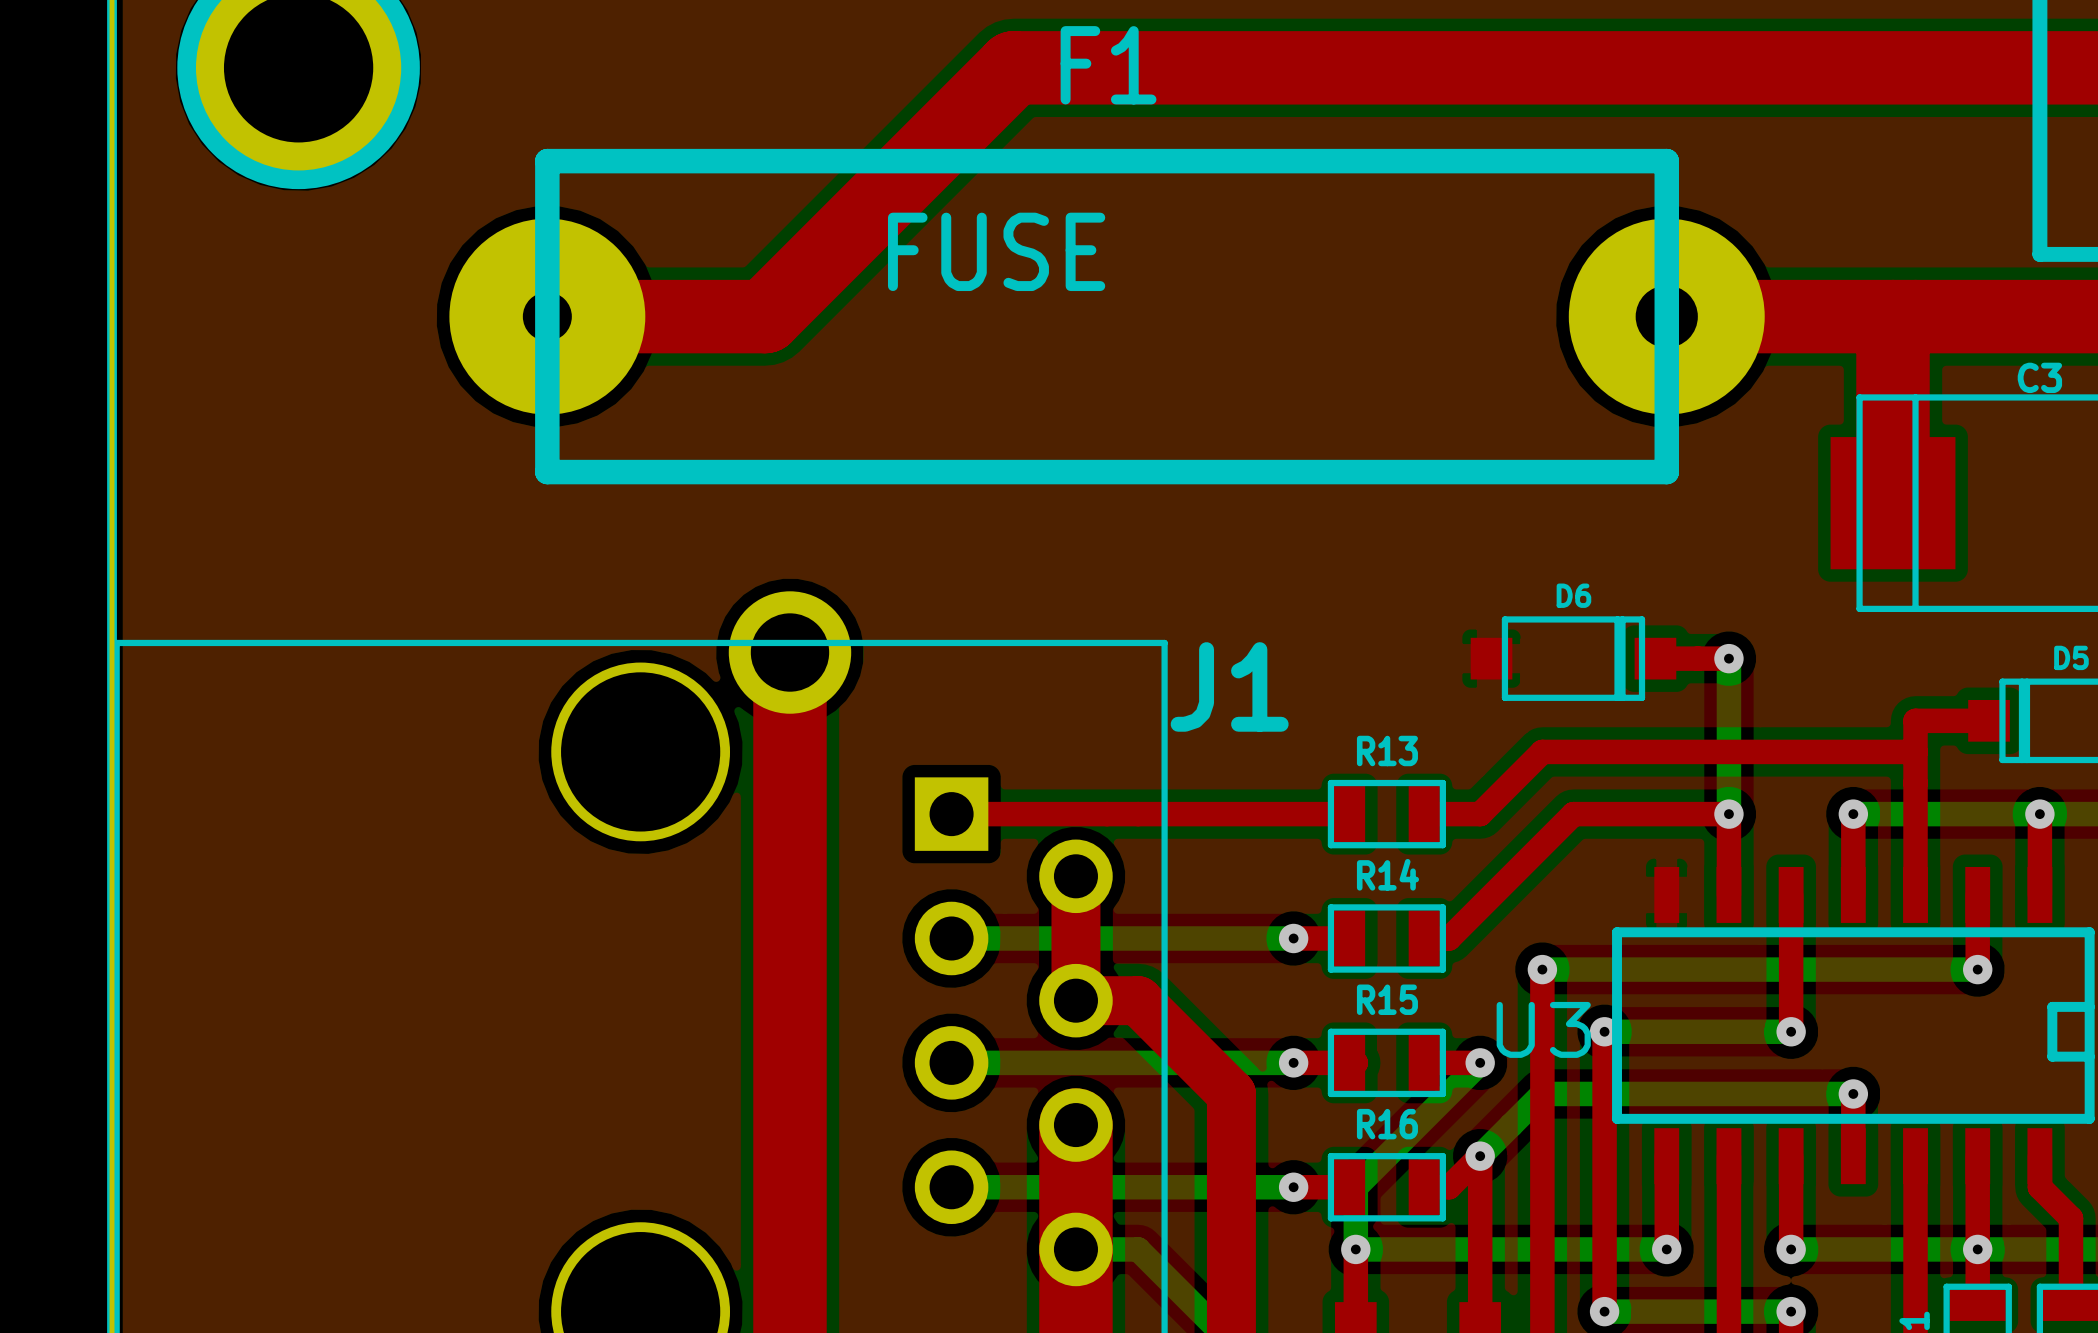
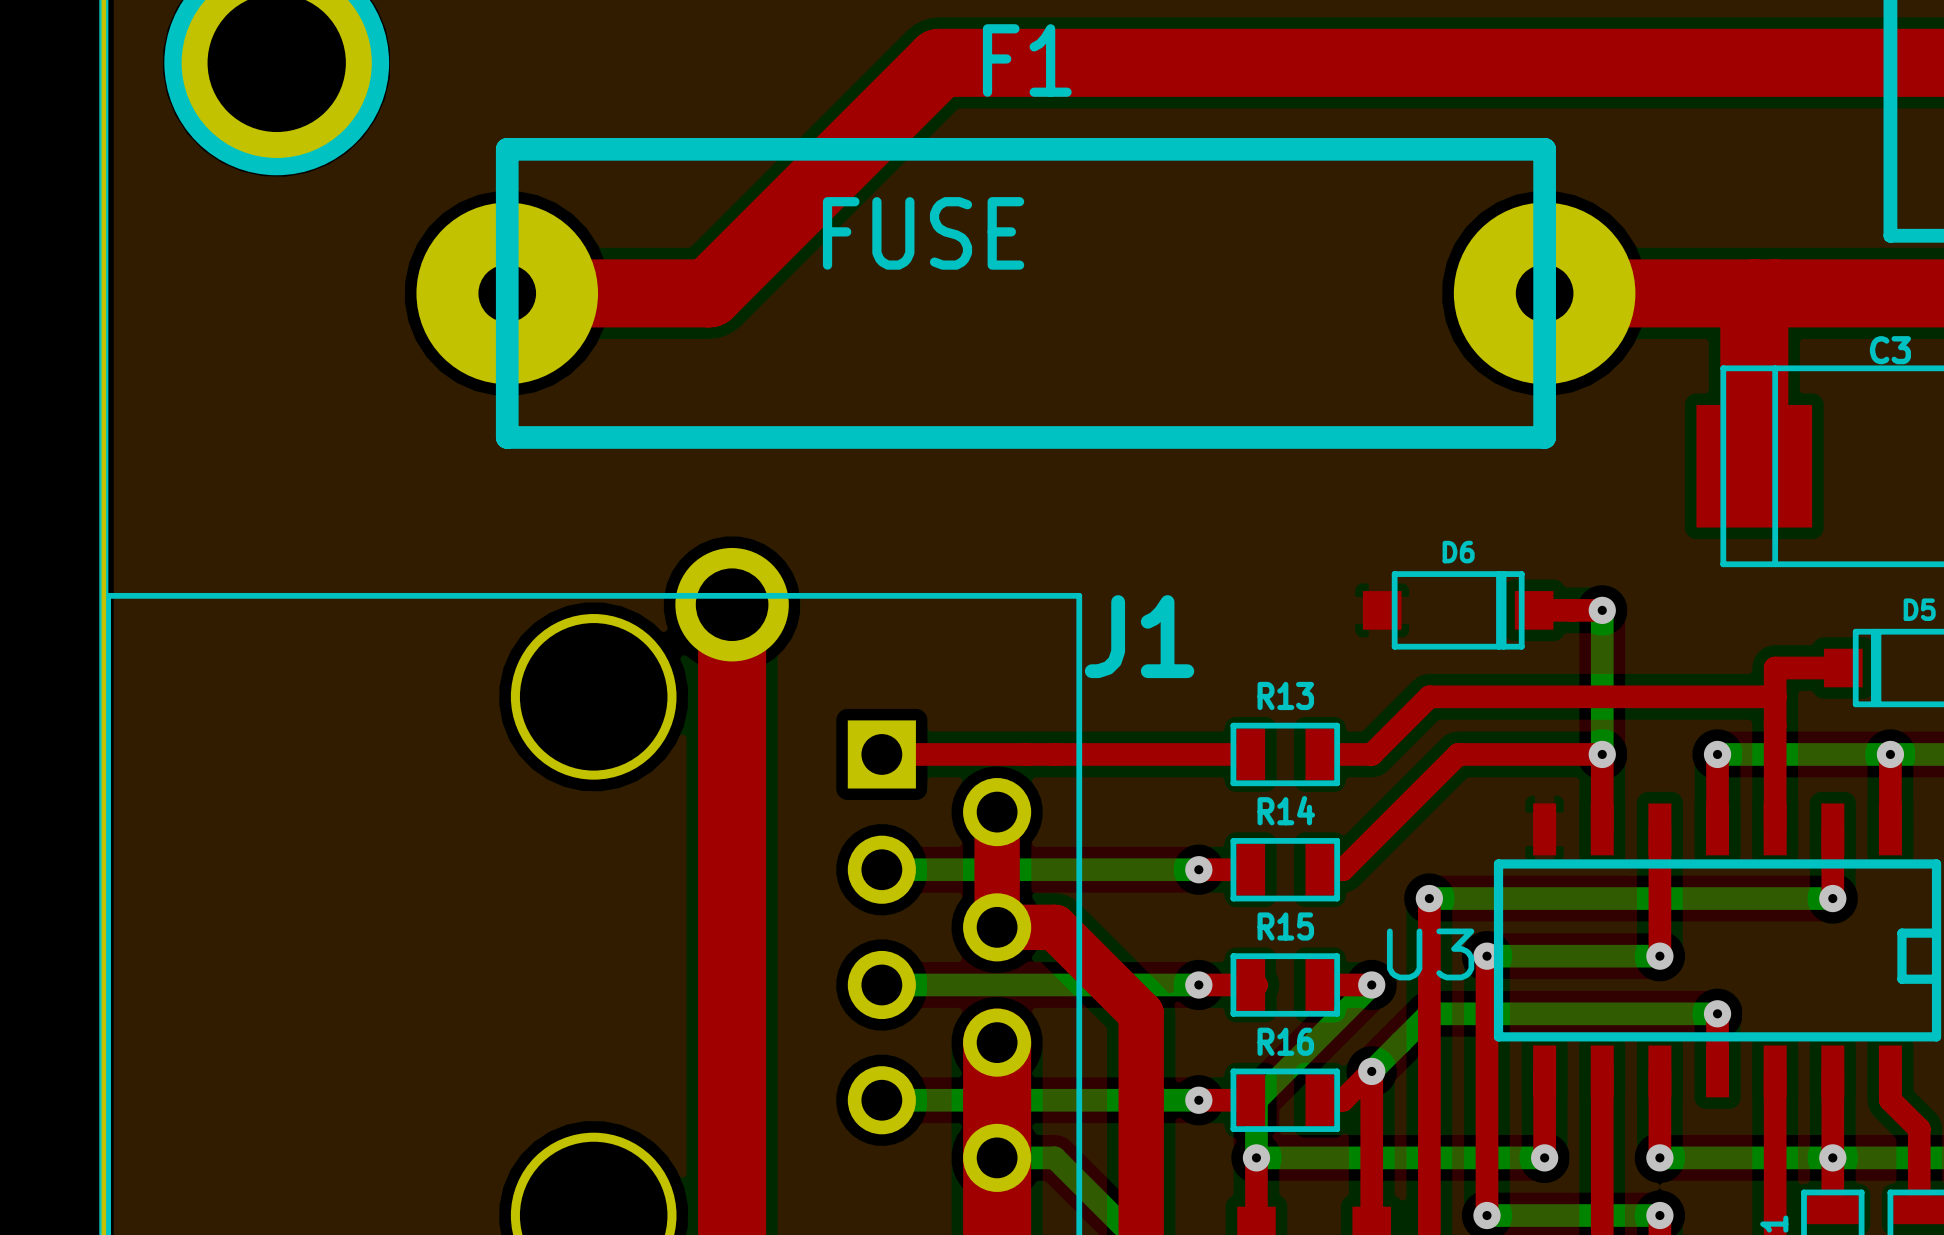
F1 footprint: [449, 148, 1765, 485] -> [416, 137, 1636, 449]

